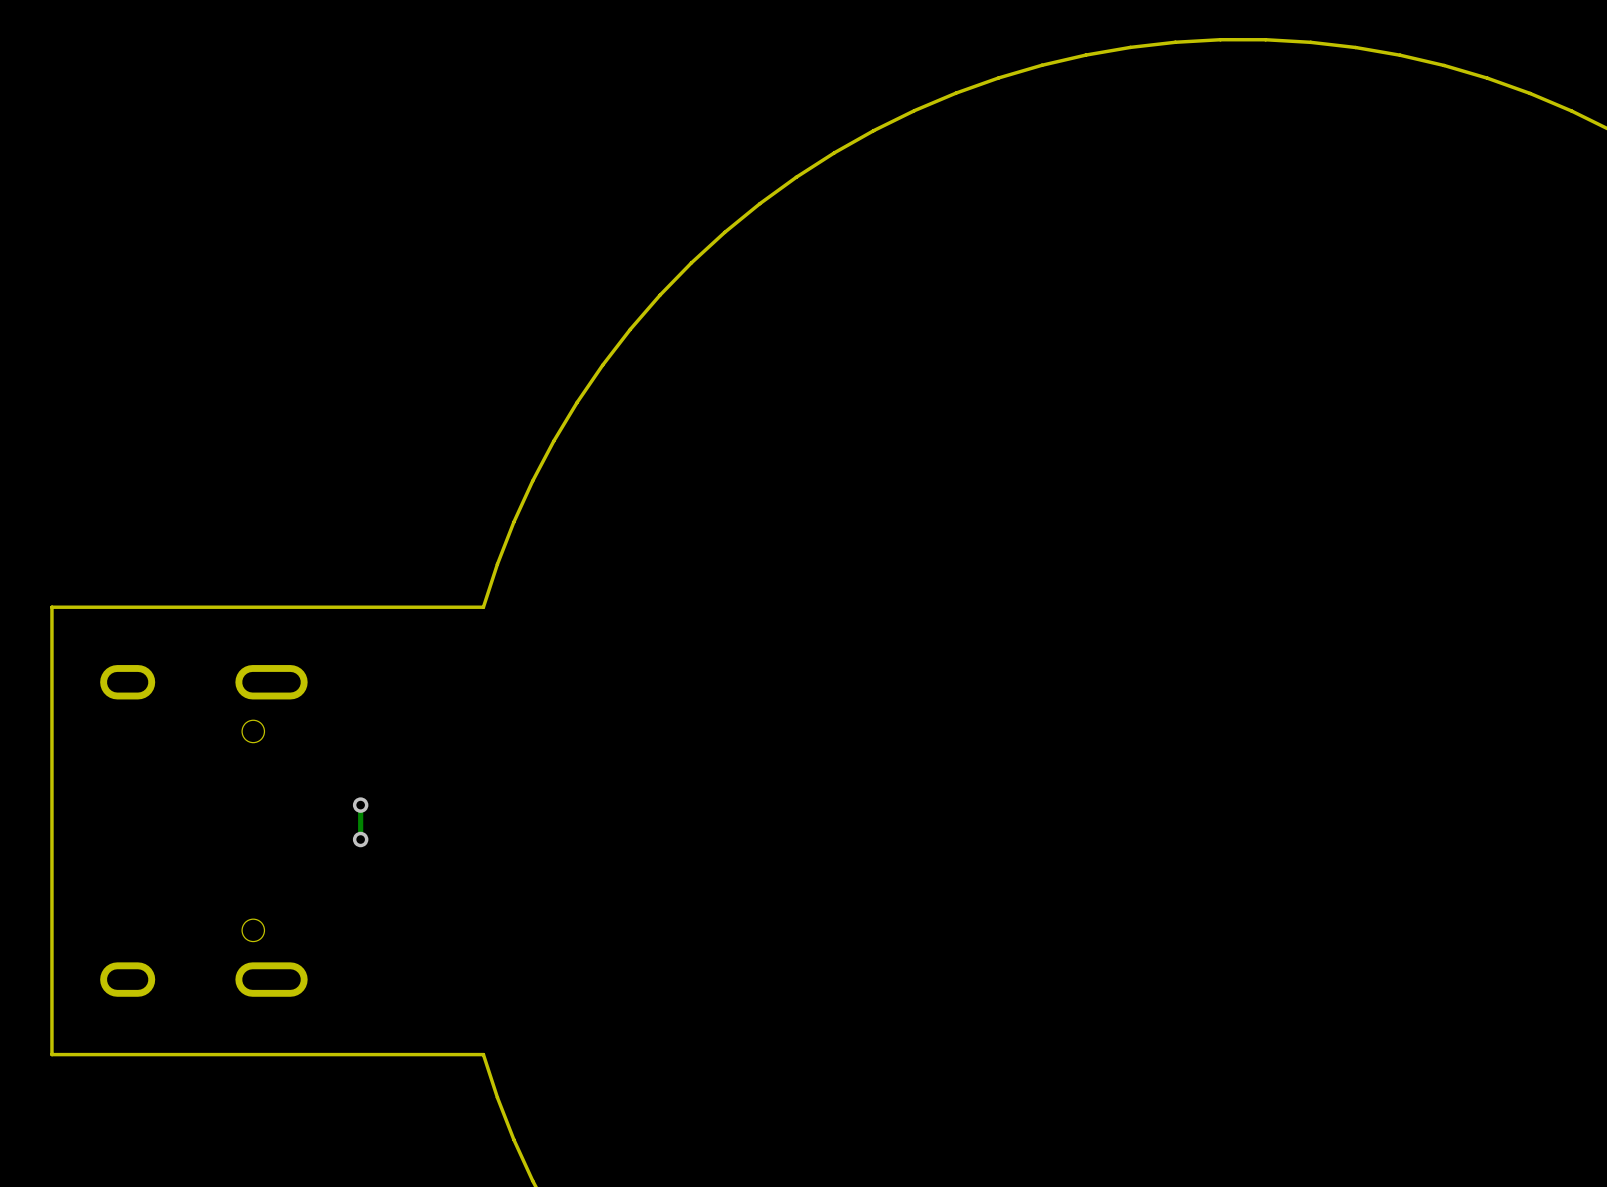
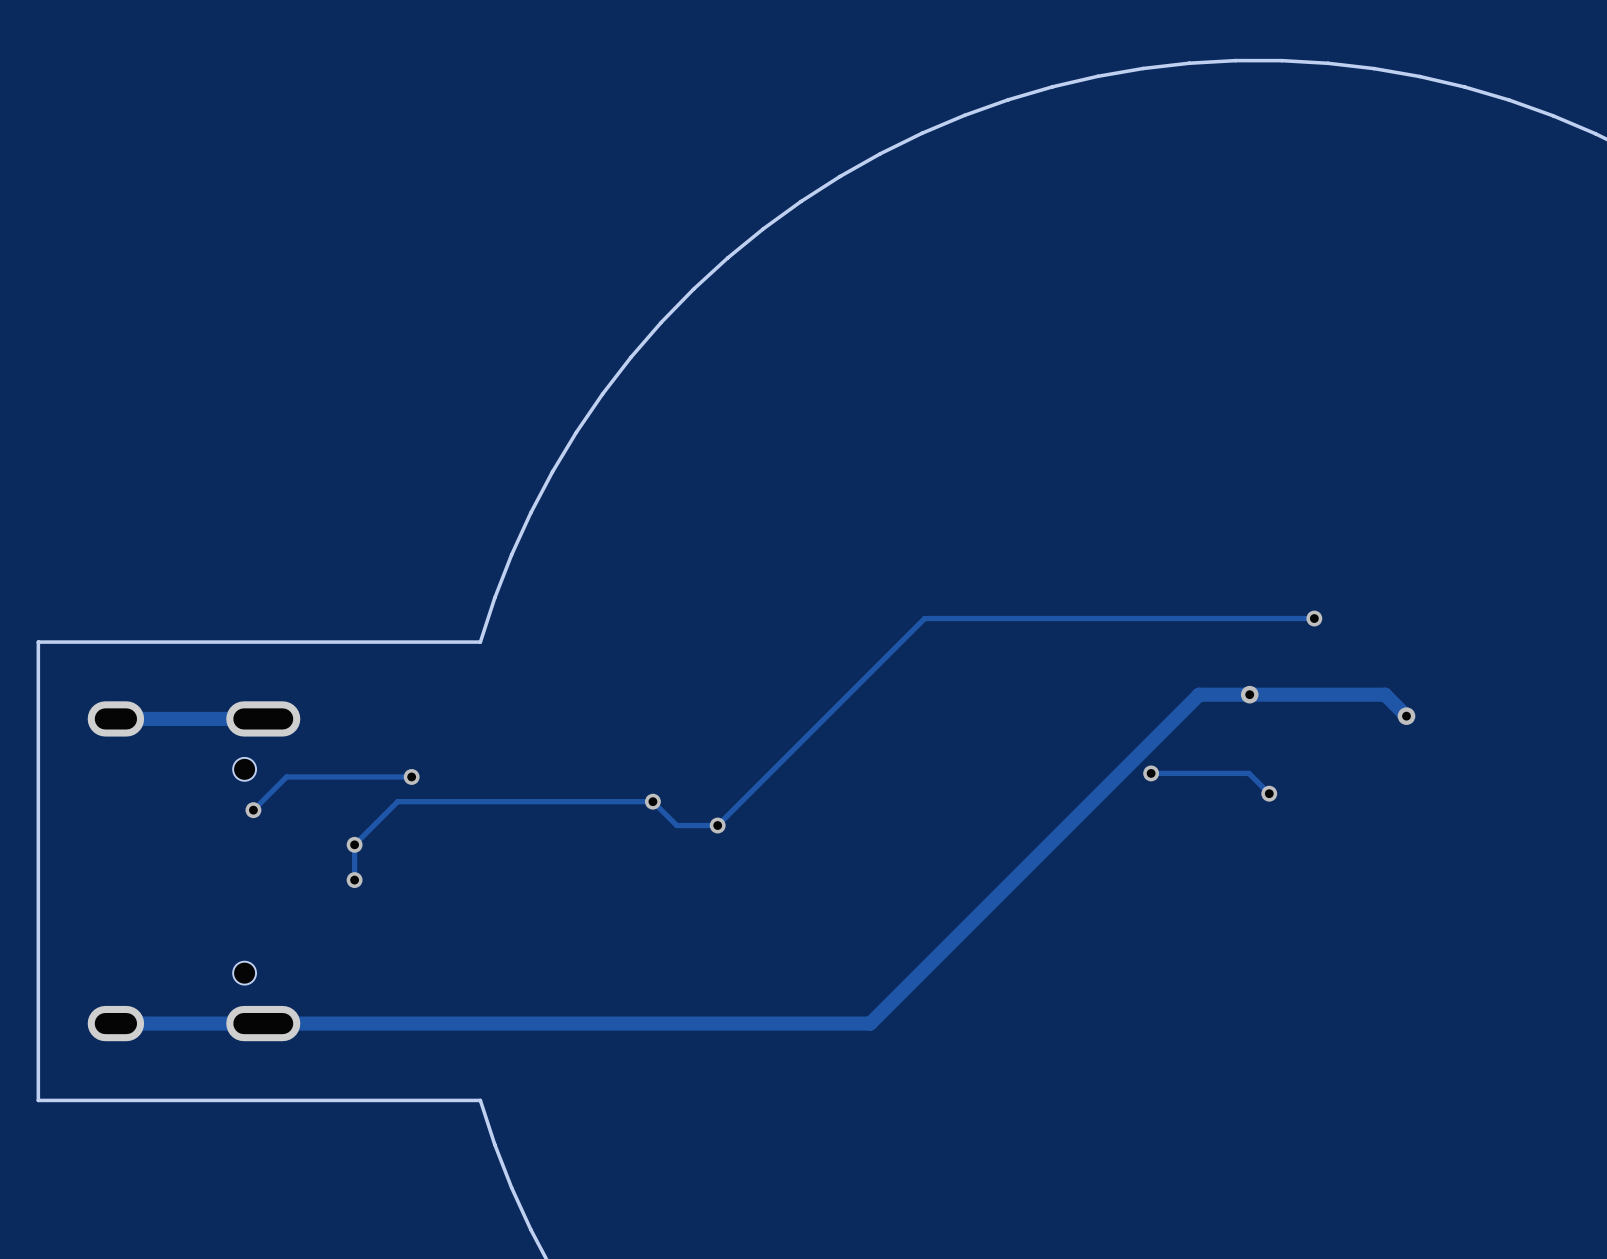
track: none -> (1314, 618) (924, 618) (717, 825) (676, 825) (652, 801) (397, 801) (354, 844)
via: none -> (1314, 618)
via: none -> (1249, 694)
track: none -> (1406, 716) (1385, 694) (1199, 694) (870, 1023) (115, 1023)
via: none -> (1406, 716)
track: none -> (263, 718) (115, 718)
track: none -> (1151, 773) (1248, 773) (1269, 793)
via: none -> (1151, 773)
track: none -> (411, 776) (286, 776) (253, 810)
via: none -> (411, 776)
via: none -> (1269, 793)
via: none -> (652, 801)
via: none -> (253, 810)
via: none -> (717, 825)

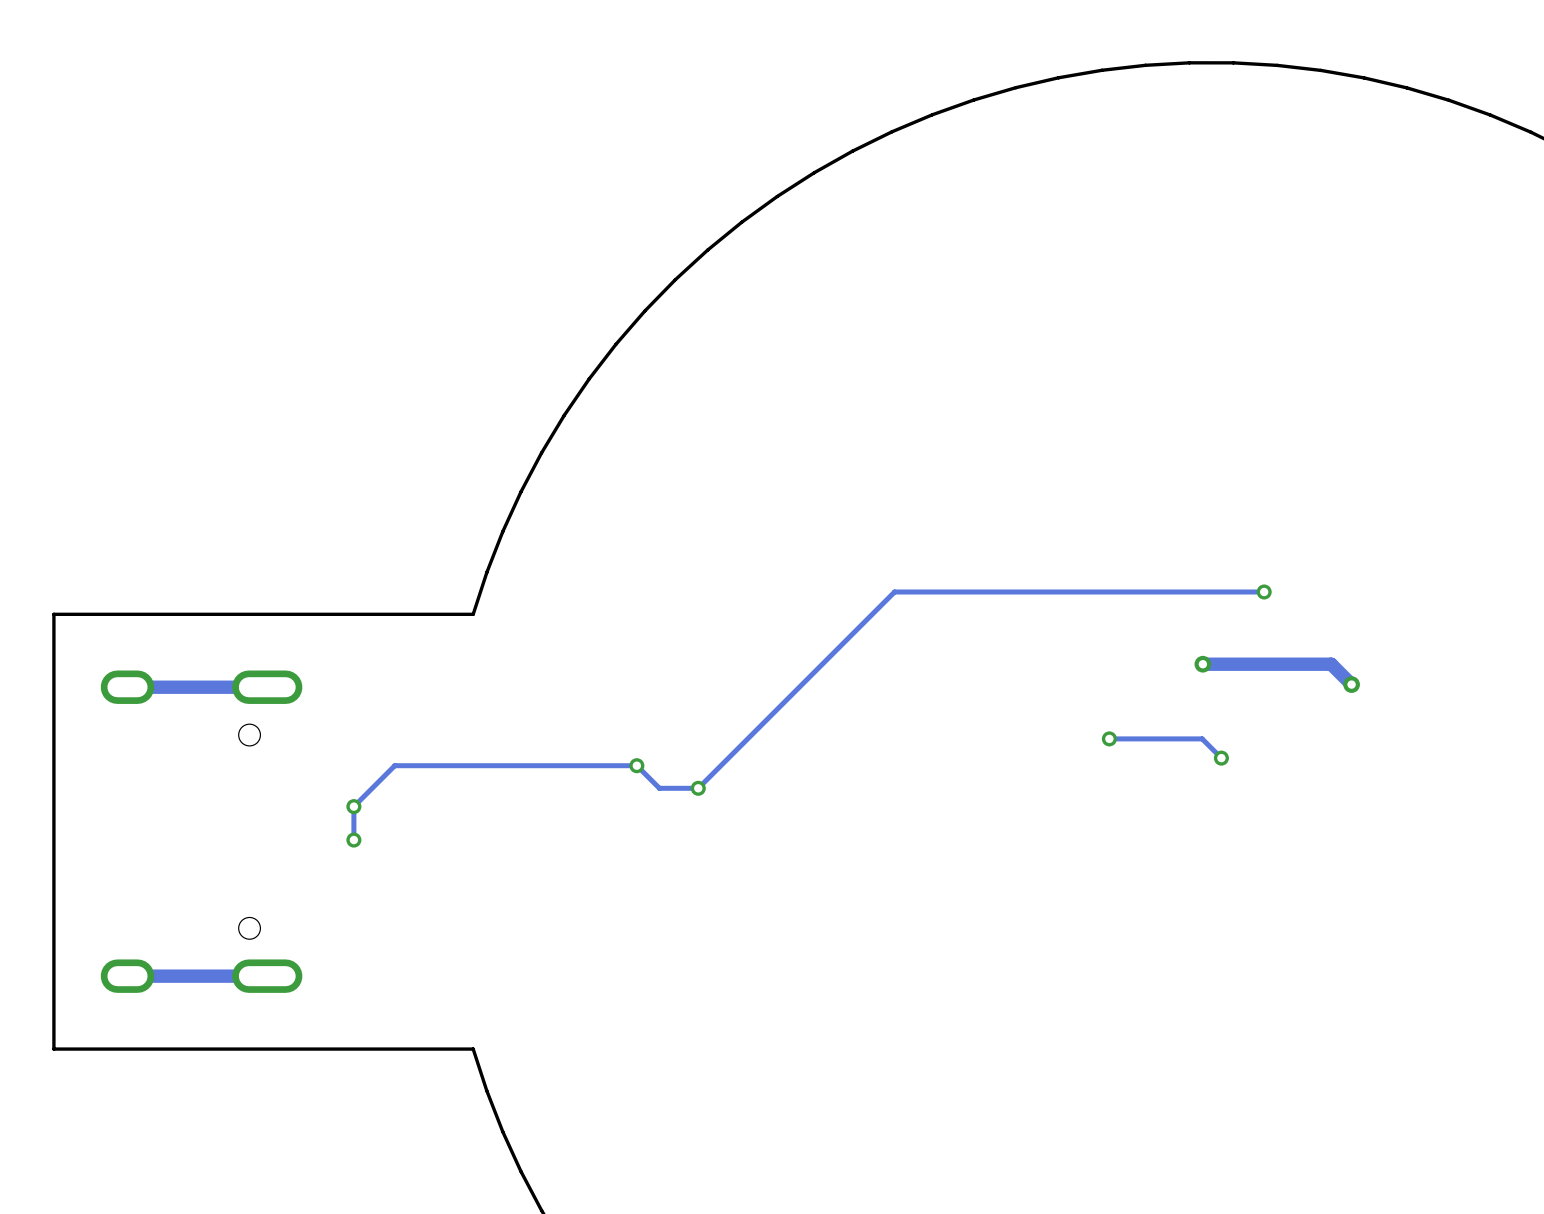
track: (1249, 694) (1199, 694) (870, 1023) (263, 1023) -> none
track: (411, 776) (286, 776) (253, 810) -> none
via: (411, 776) -> none
via: (253, 810) -> none

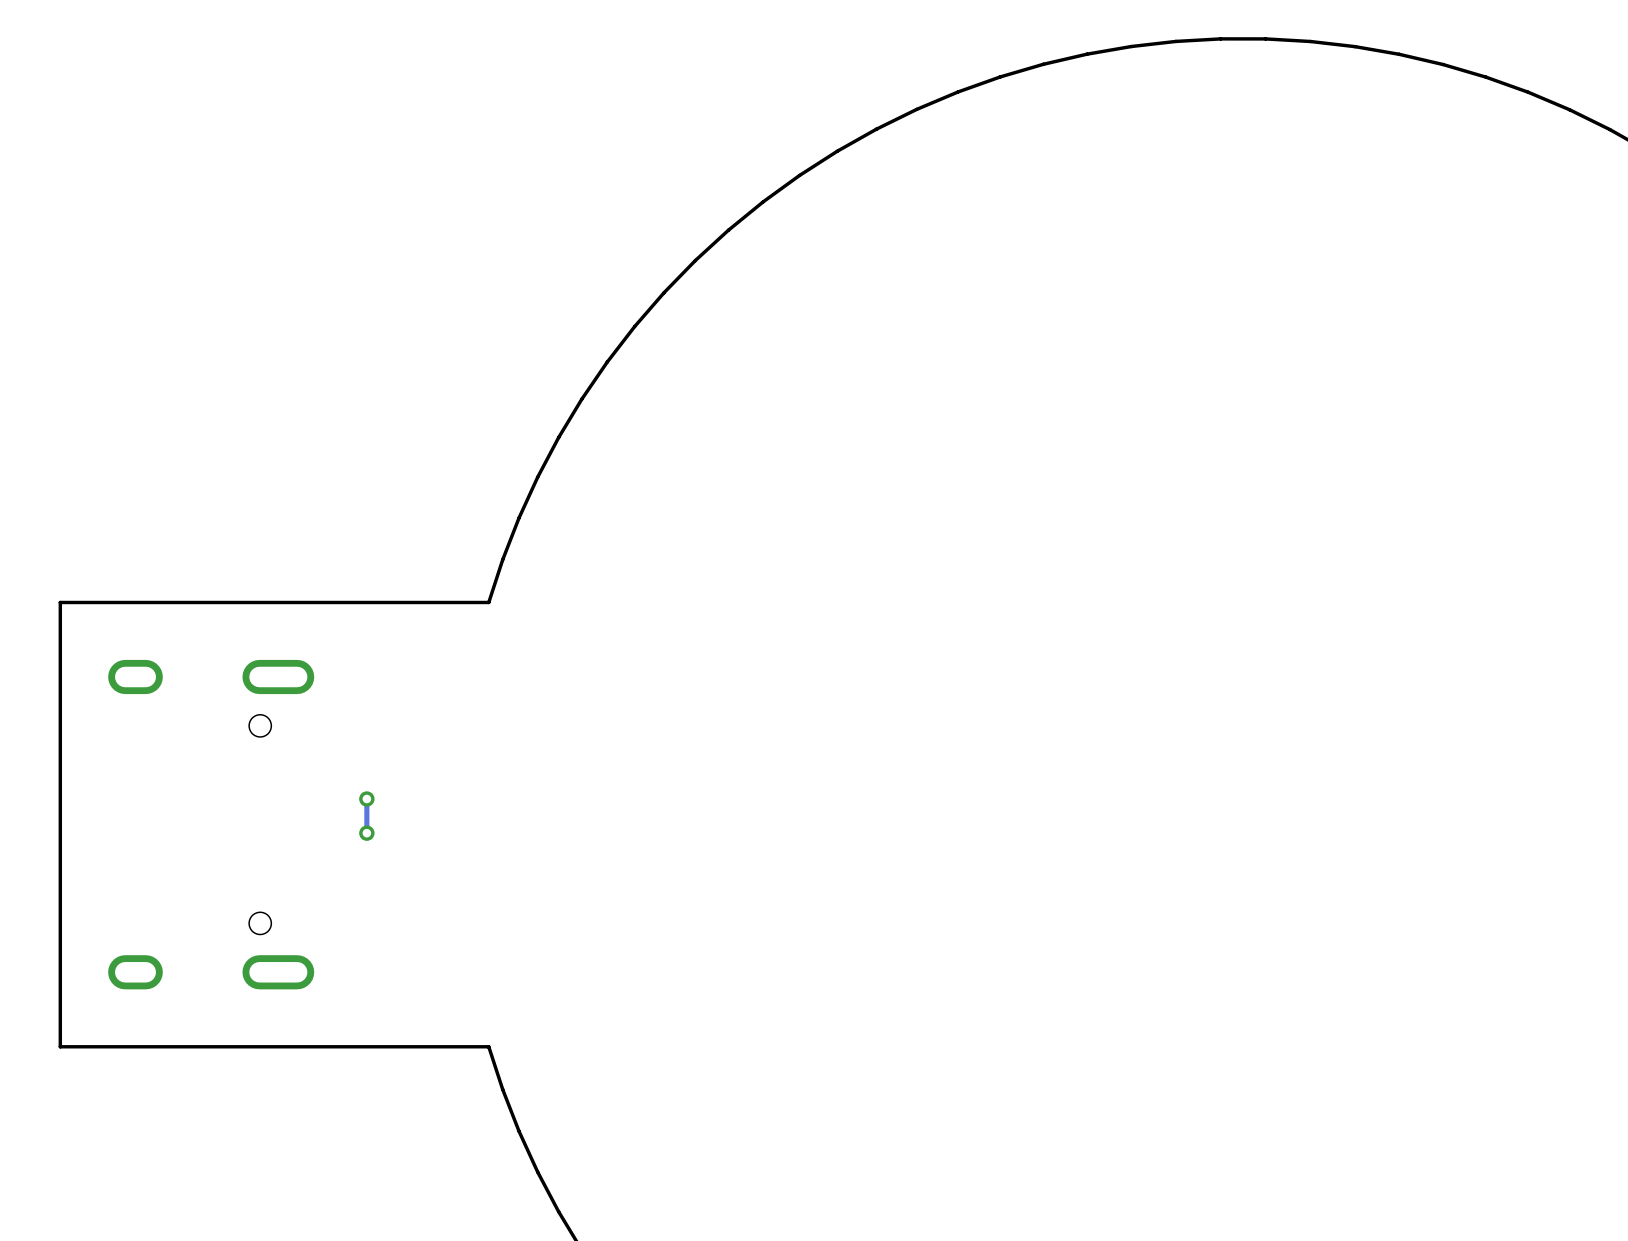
track: (1264, 592) (894, 592) (698, 788) (659, 788) (636, 765) (394, 765) (353, 806) -> none
via: (1264, 592) -> none
track: (1202, 664) (1331, 664) (1351, 684) -> none
via: (1202, 664) -> none
via: (1351, 684) -> none
track: (267, 687) (127, 687) -> none
track: (1109, 738) (1202, 738) (1221, 758) -> none
via: (1109, 738) -> none
via: (1221, 758) -> none
via: (636, 765) -> none
via: (698, 788) -> none
track: (267, 976) (127, 976) -> none

